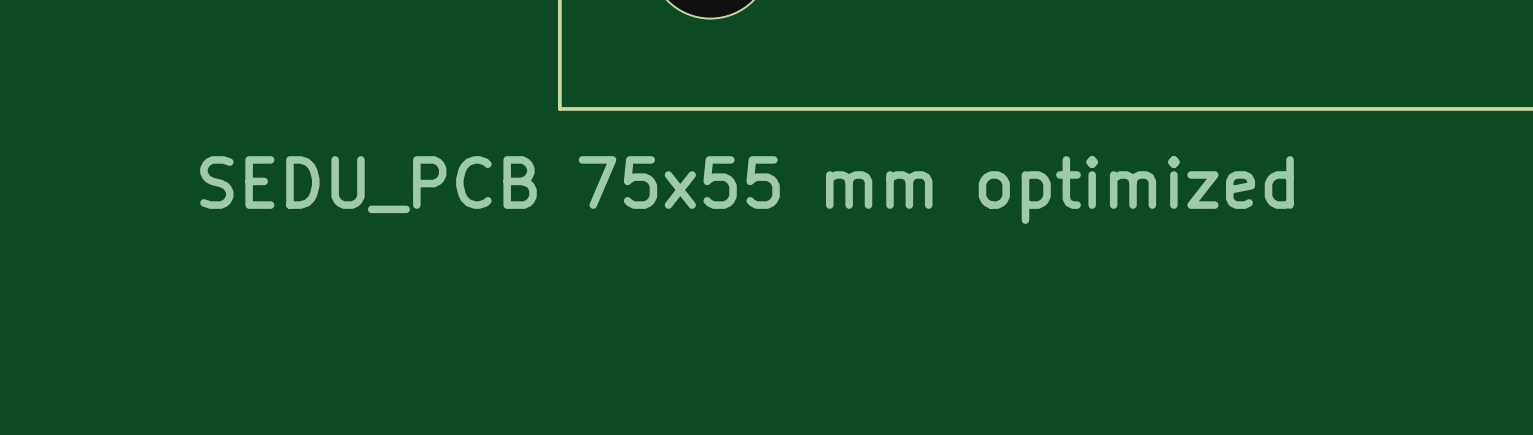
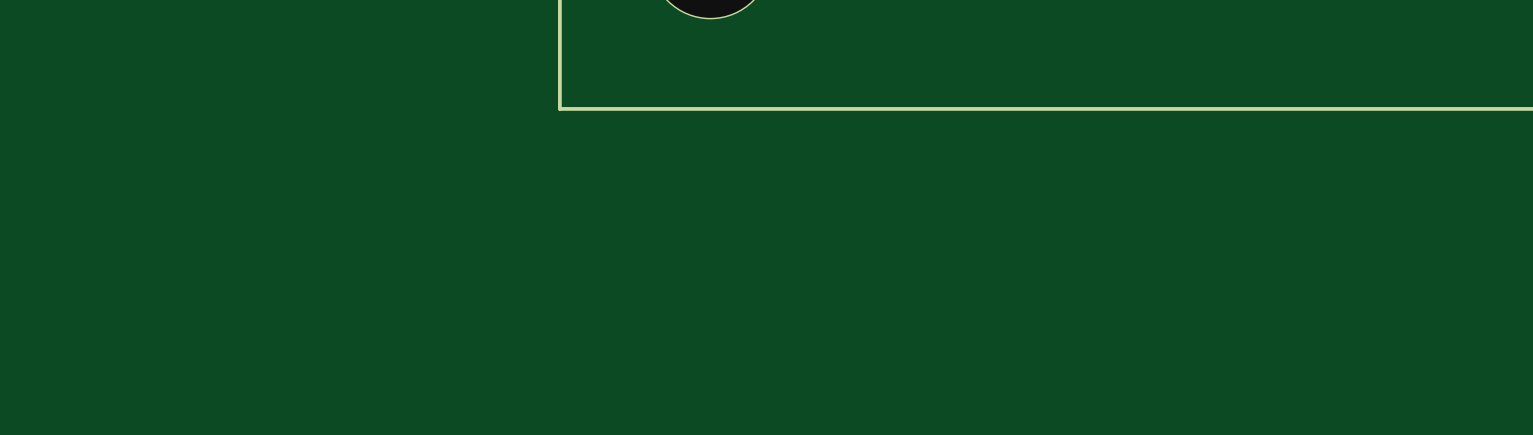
text: SEDU_PCB 75x55 mm optimized (746, 190) -> none

